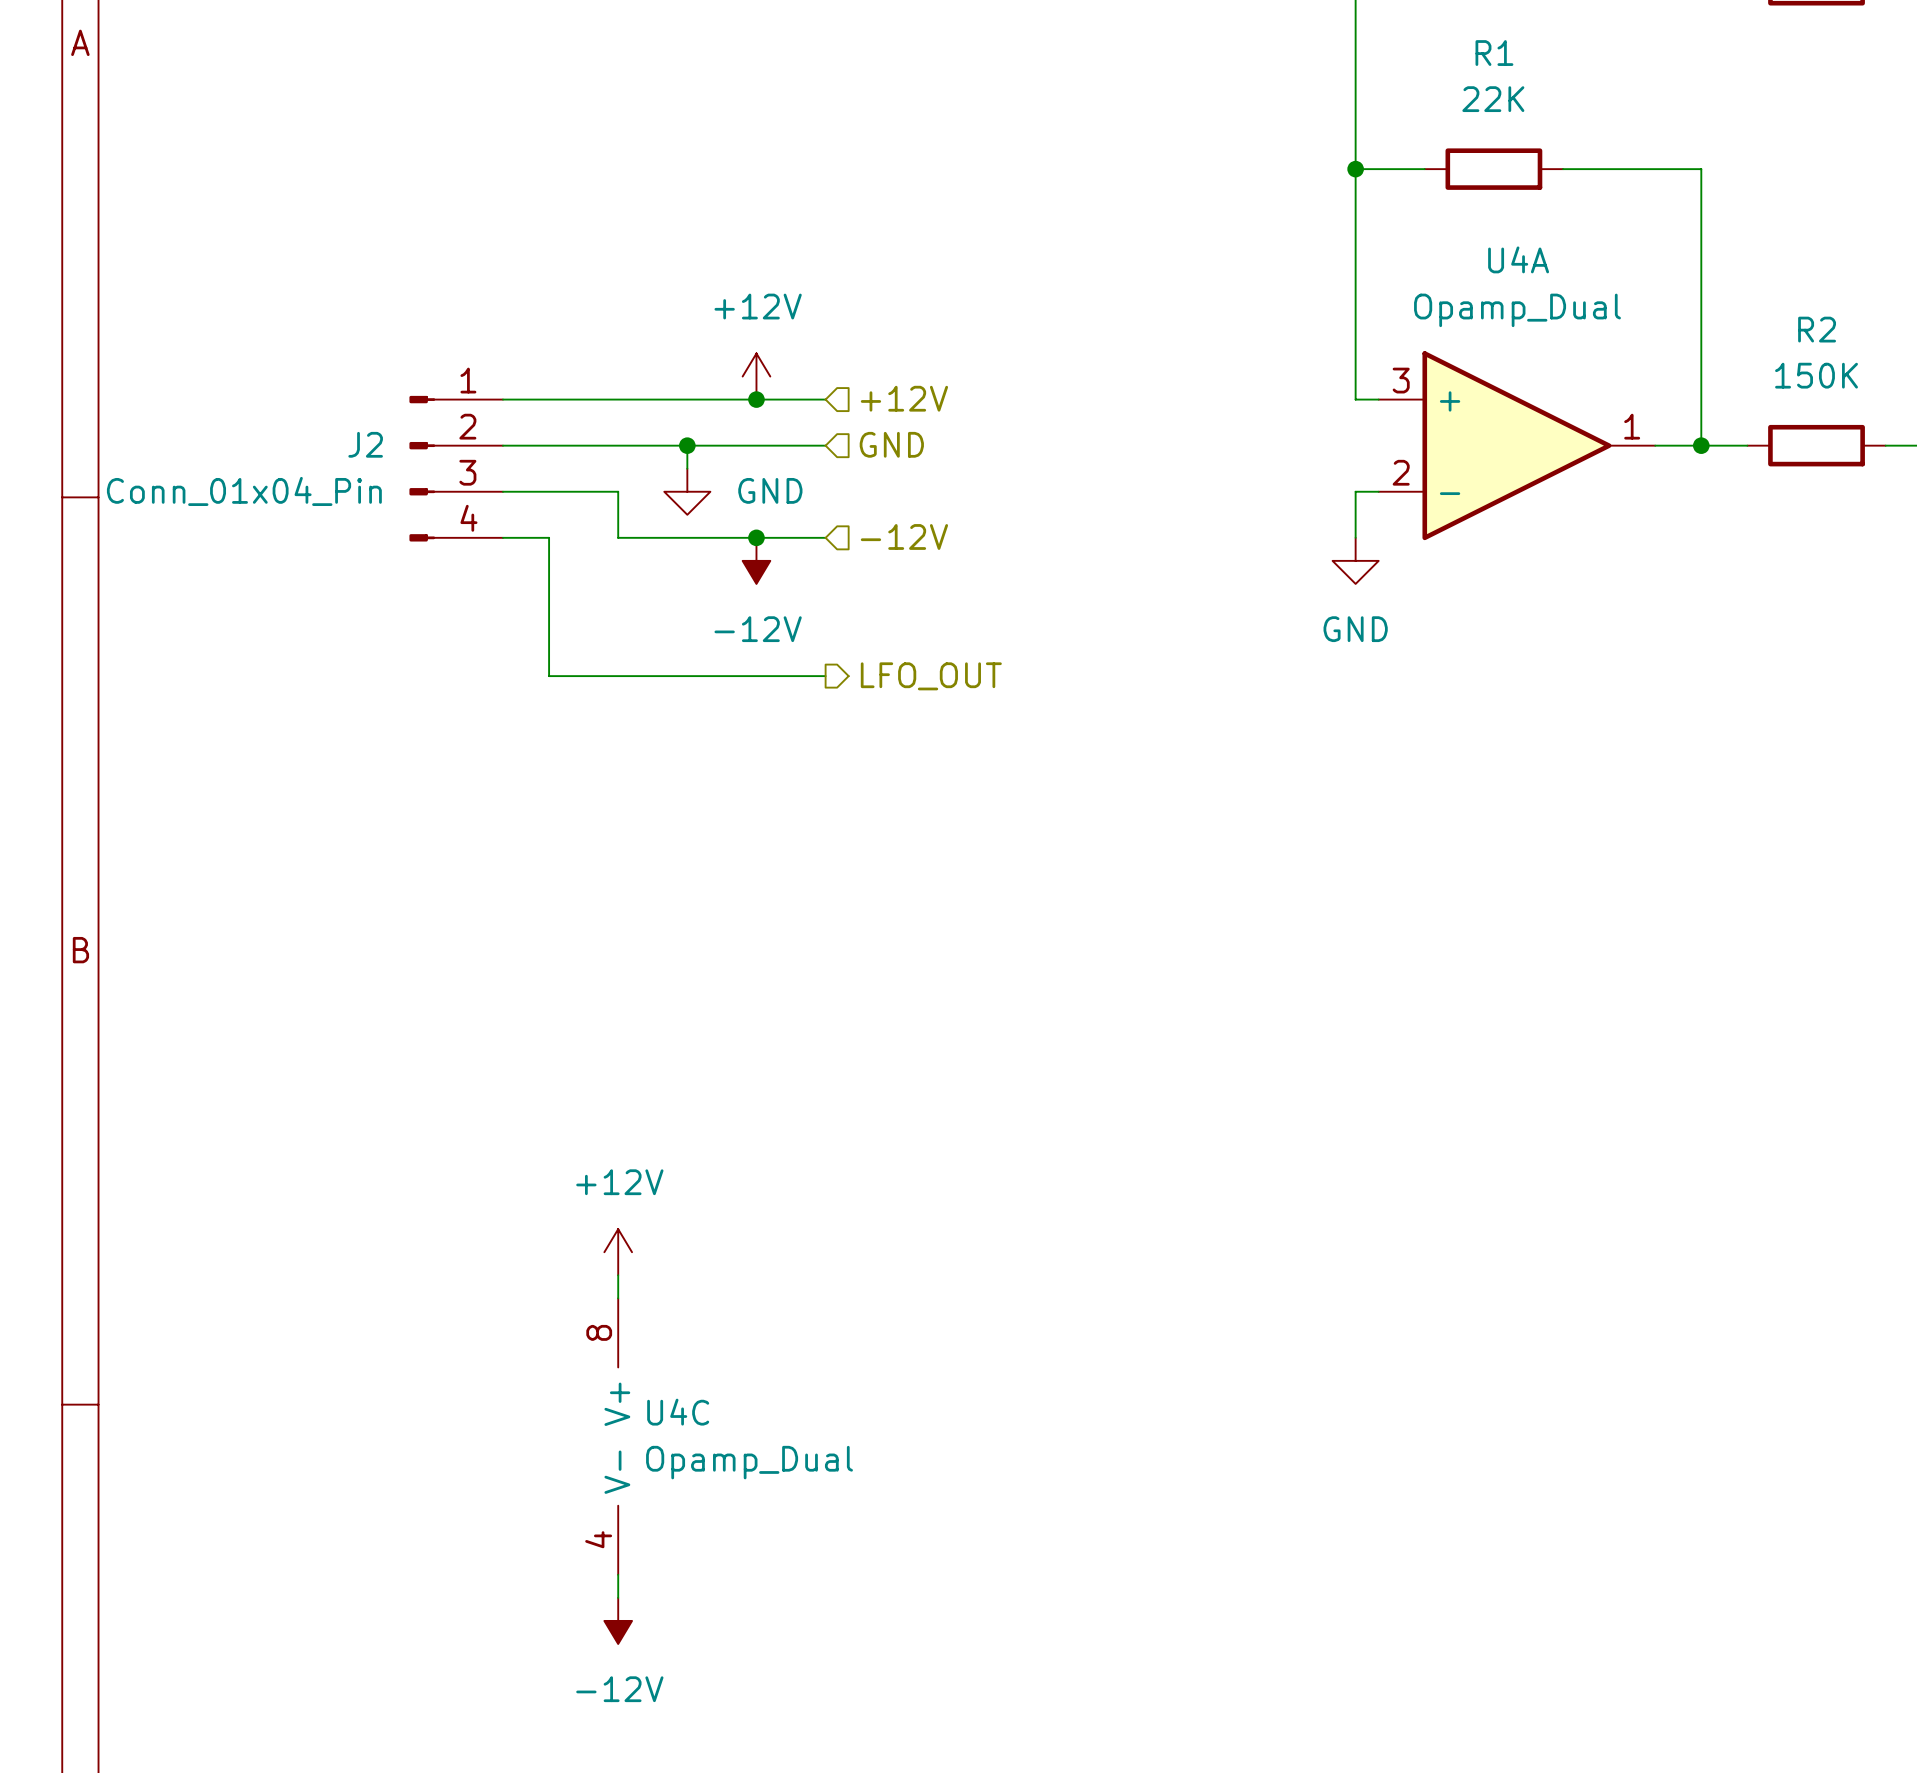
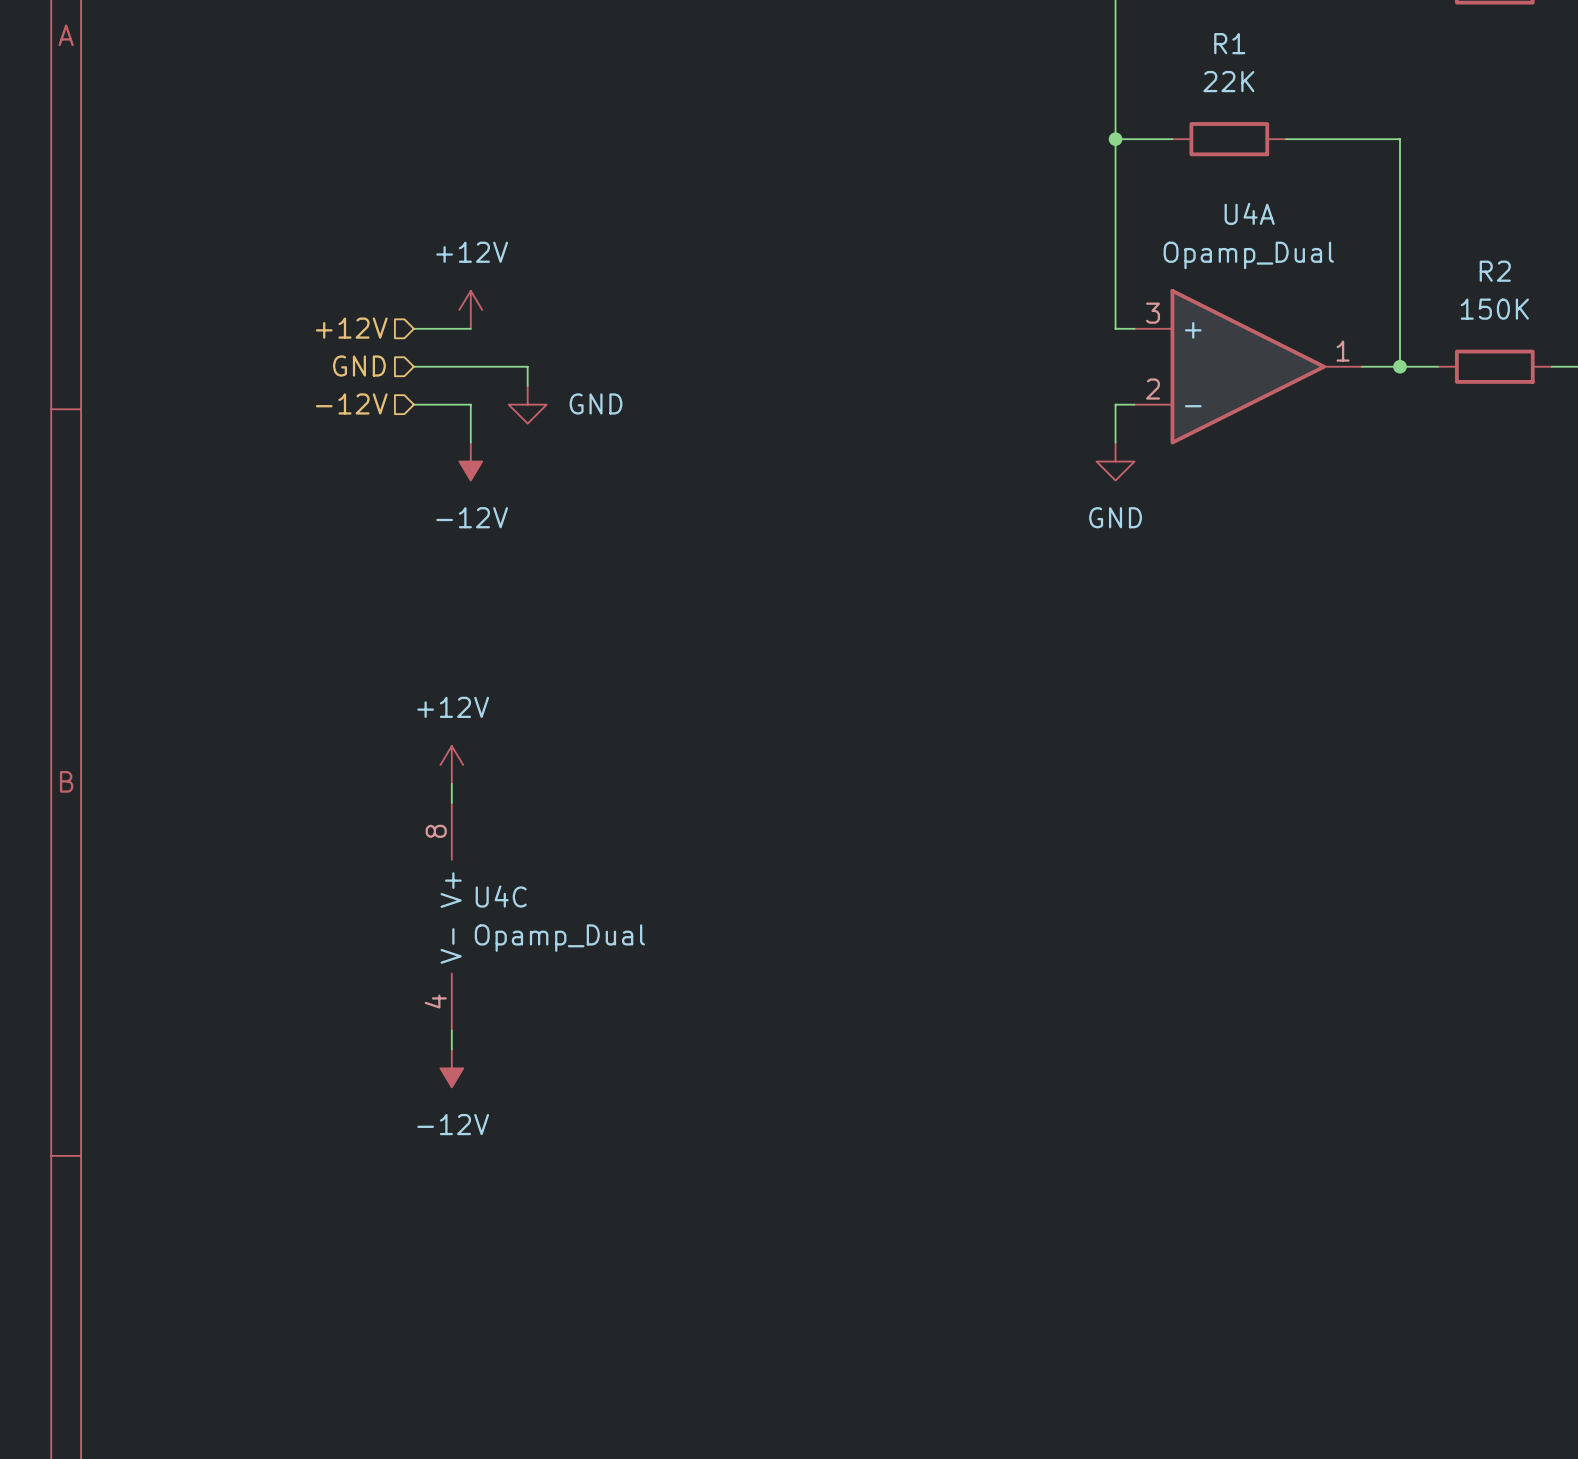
power symbol position: +12V (756, 376) -> +12V (470, 309)
hierarchical label rotation: 0° (904, 398) -> 180° (351, 328)
hierarchical label position: +12V (904, 398) -> +12V (351, 328)
wire: (572, 399) (825, 399) -> none
junction: (756, 399) -> none
hierarchical label rotation: 0° (891, 444) -> 180° (359, 366)
hierarchical label position: GND (891, 444) -> GND (359, 366)
wire: (641, 445) (825, 445) -> (527, 366) (527, 385)
wire: (687, 445) (687, 468) -> none
junction: (687, 445) -> none
J2: Conn_01x04_Pin (456, 468) -> none
wire: (572, 491) (618, 491) (618, 537) (825, 537) -> (470, 404) (470, 442)
power symbol position: GND (687, 491) -> GND (527, 404)
hierarchical label rotation: 0° (904, 536) -> 180° (351, 403)
hierarchical label position: -12V (904, 536) -> -12V (351, 403)
wire: (502, 537) (549, 537) (549, 676) (825, 676) -> none
junction: (756, 537) -> none
power symbol position: -12V (756, 560) -> -12V (470, 461)
hierarchical label: LFO_OUT (931, 676) -> none
power symbol: none -> +12V (451, 764)
power symbol: +12V (618, 1252) -> none
wire: (618, 1275) (618, 1298) -> (451, 783) (451, 802)
U4C position: (618, 1436) -> (451, 916)
wire: (618, 1574) (618, 1597) -> (451, 1030) (451, 1049)
power symbol position: -12V (618, 1620) -> -12V (451, 1068)

